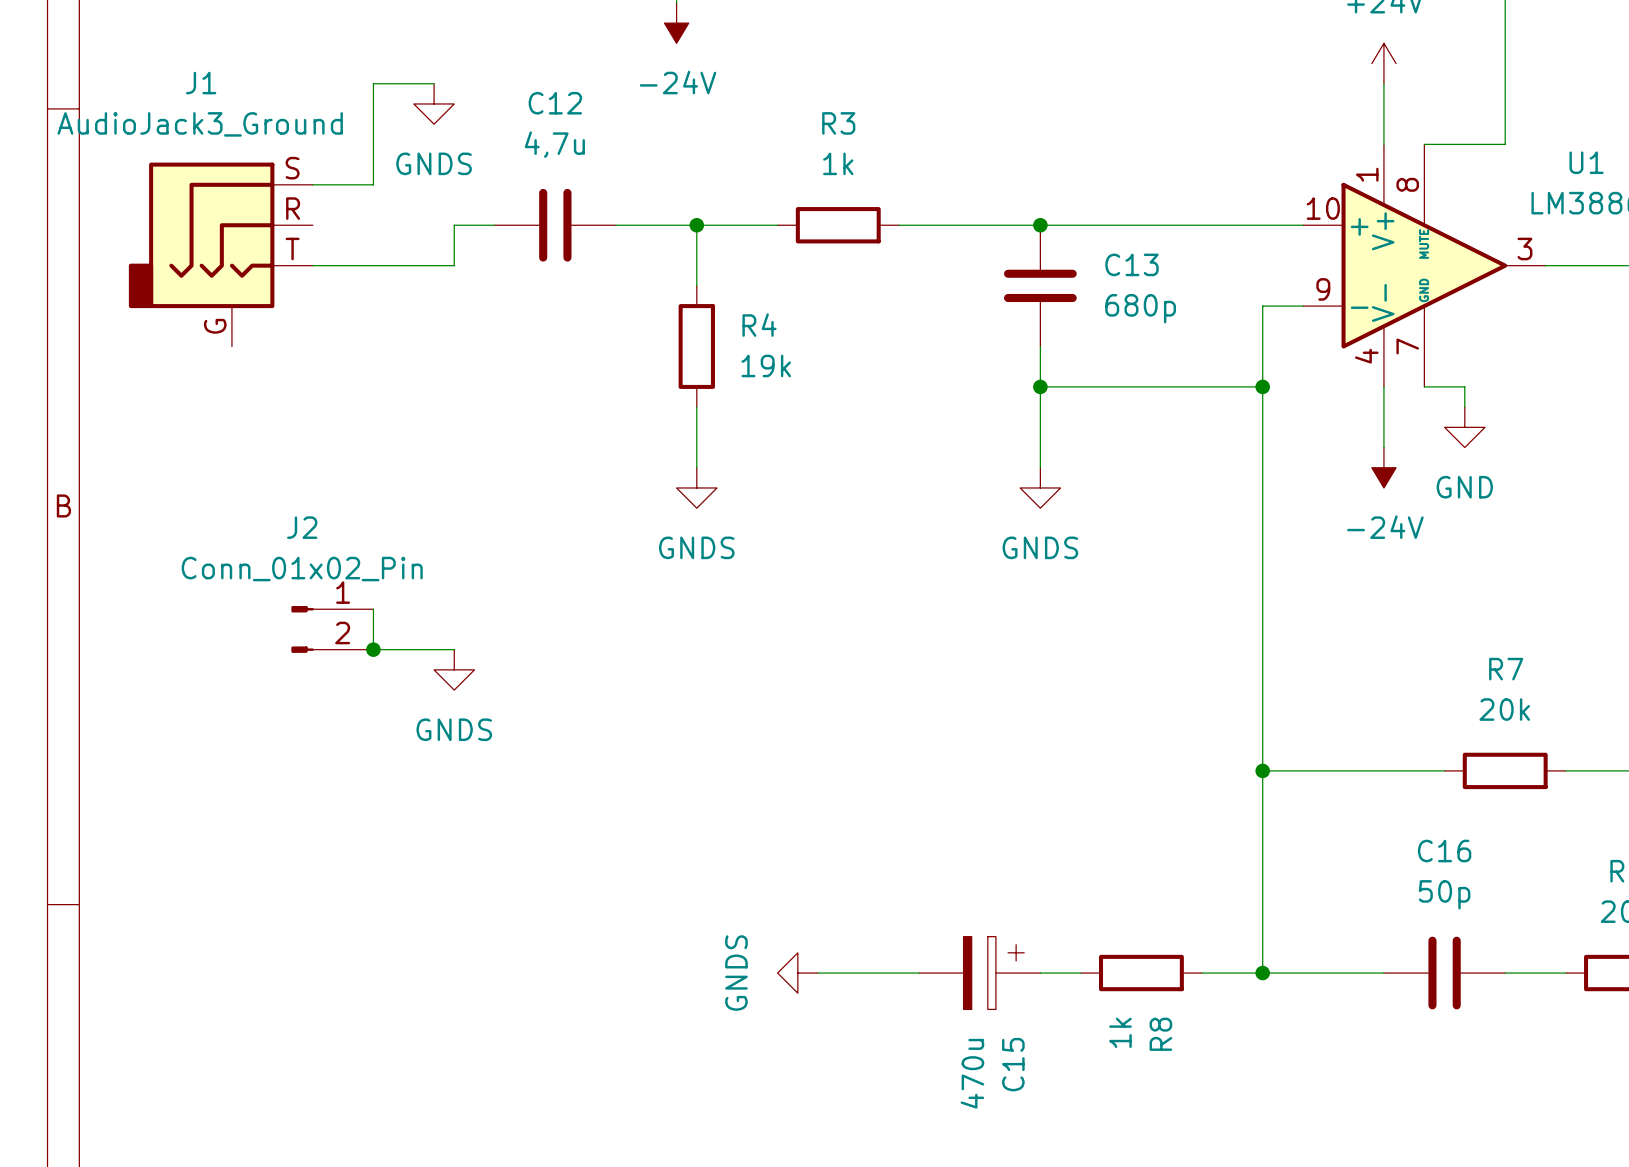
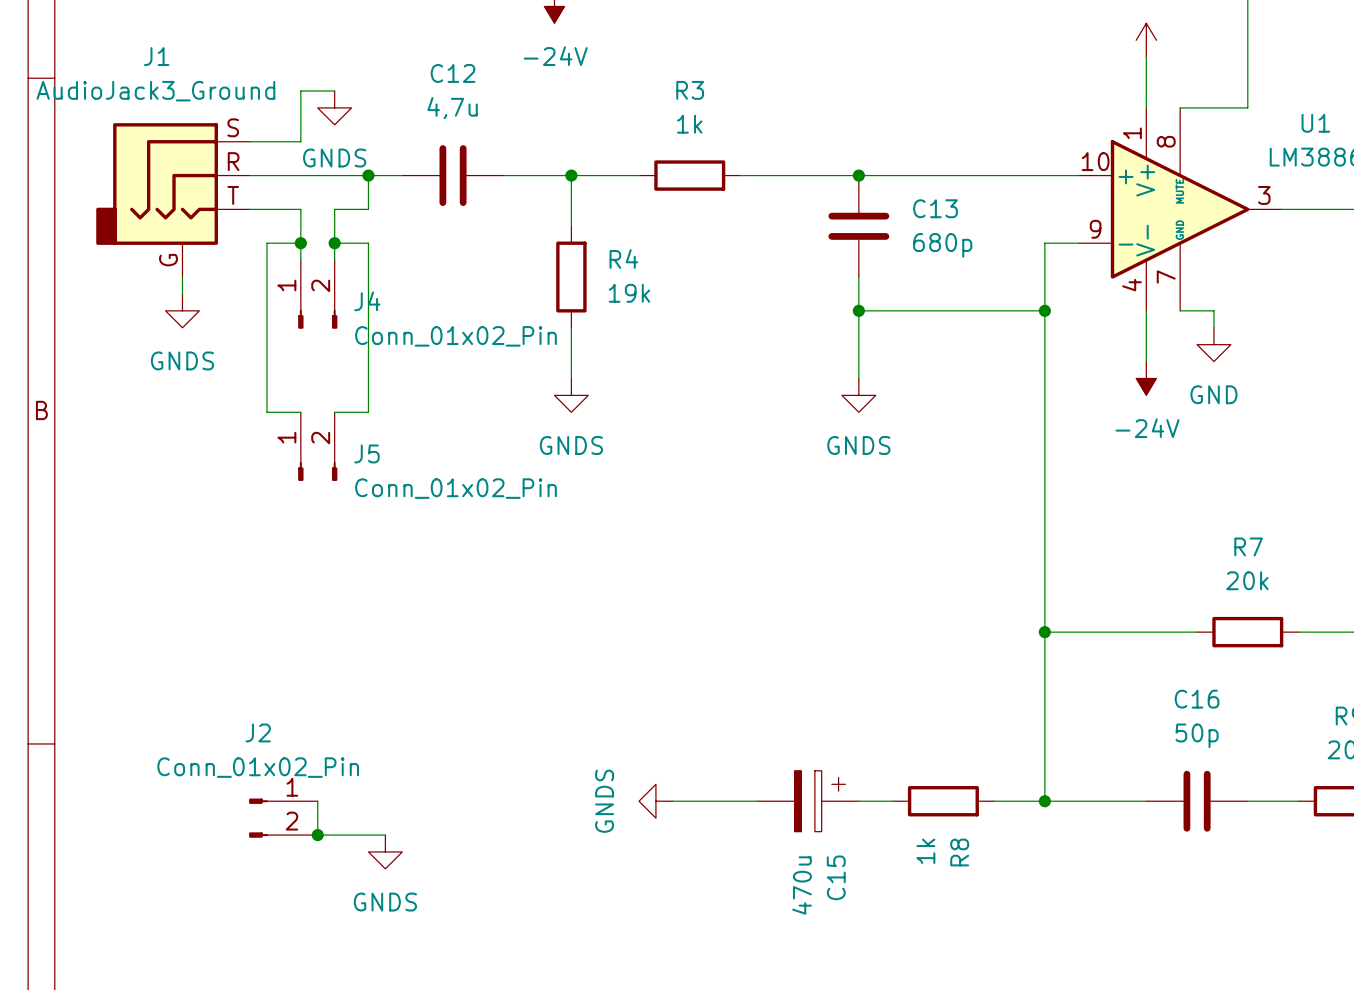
wire: (434, 83) (373, 83) (373, 124) -> (334, 91) (300, 91)
power symbol position: GNDS (434, 103) -> GNDS (334, 107)
wire: none -> (250, 175) (368, 175)
junction: none -> (368, 175)
wire: (373, 265) (413, 265) -> (300, 209) (300, 260)
wire: none -> (334, 209) (334, 260)
wire: none -> (300, 243) (267, 243) (267, 412) (300, 412)
junction: none -> (300, 243)
wire: none -> (334, 243) (368, 243) (368, 412) (334, 412)
junction: none -> (334, 243)
wire: none -> (182, 277) (182, 293)
J4: none -> Conn_01x02_Pin (317, 294)
power symbol: none -> GNDS (182, 310)
J5: none -> Conn_01x02_Pin (317, 446)
wire: (373, 609) (373, 649) (454, 649) -> (317, 801) (317, 835) (385, 835)
J2 position: (332, 629) -> (283, 818)
junction: (373, 649) -> none
power symbol: GNDS (454, 669) -> none
junction: none -> (317, 835)
power symbol: none -> GNDS (385, 851)

